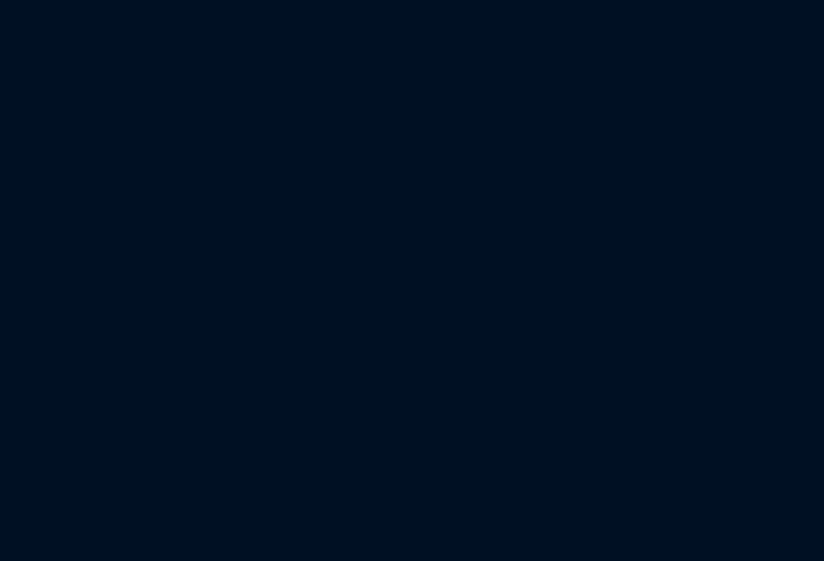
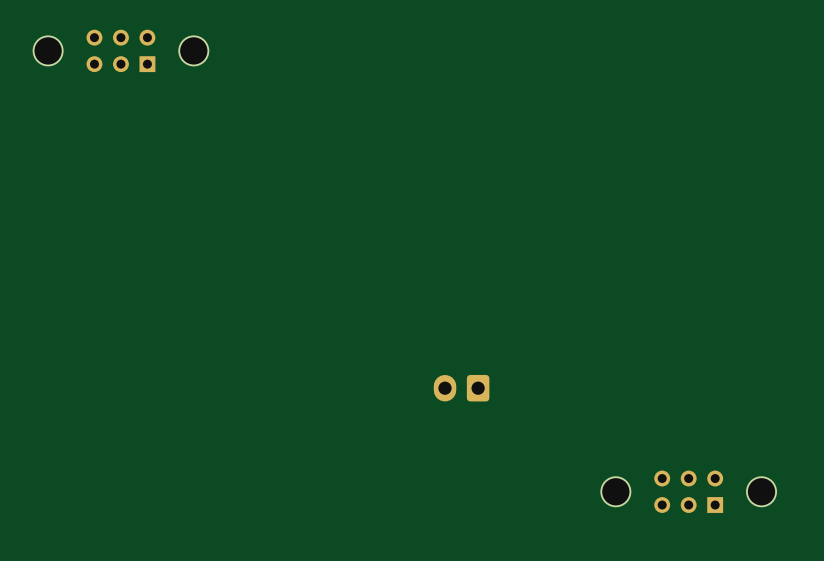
part: none -> (120, 50)
part: none -> (461, 388)
part: none -> (688, 491)

